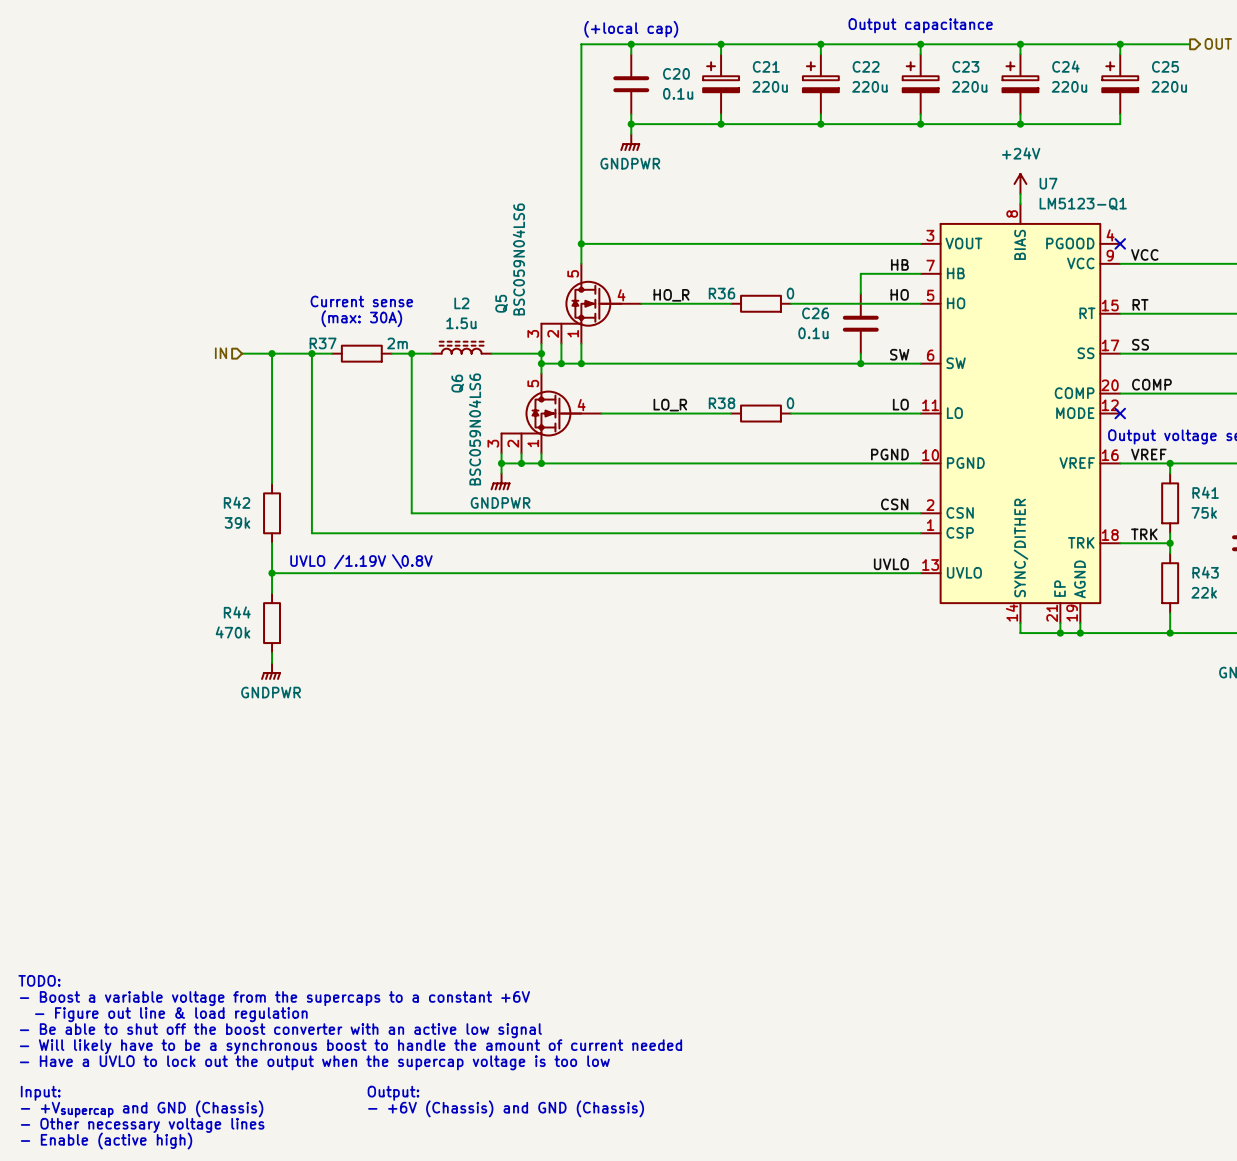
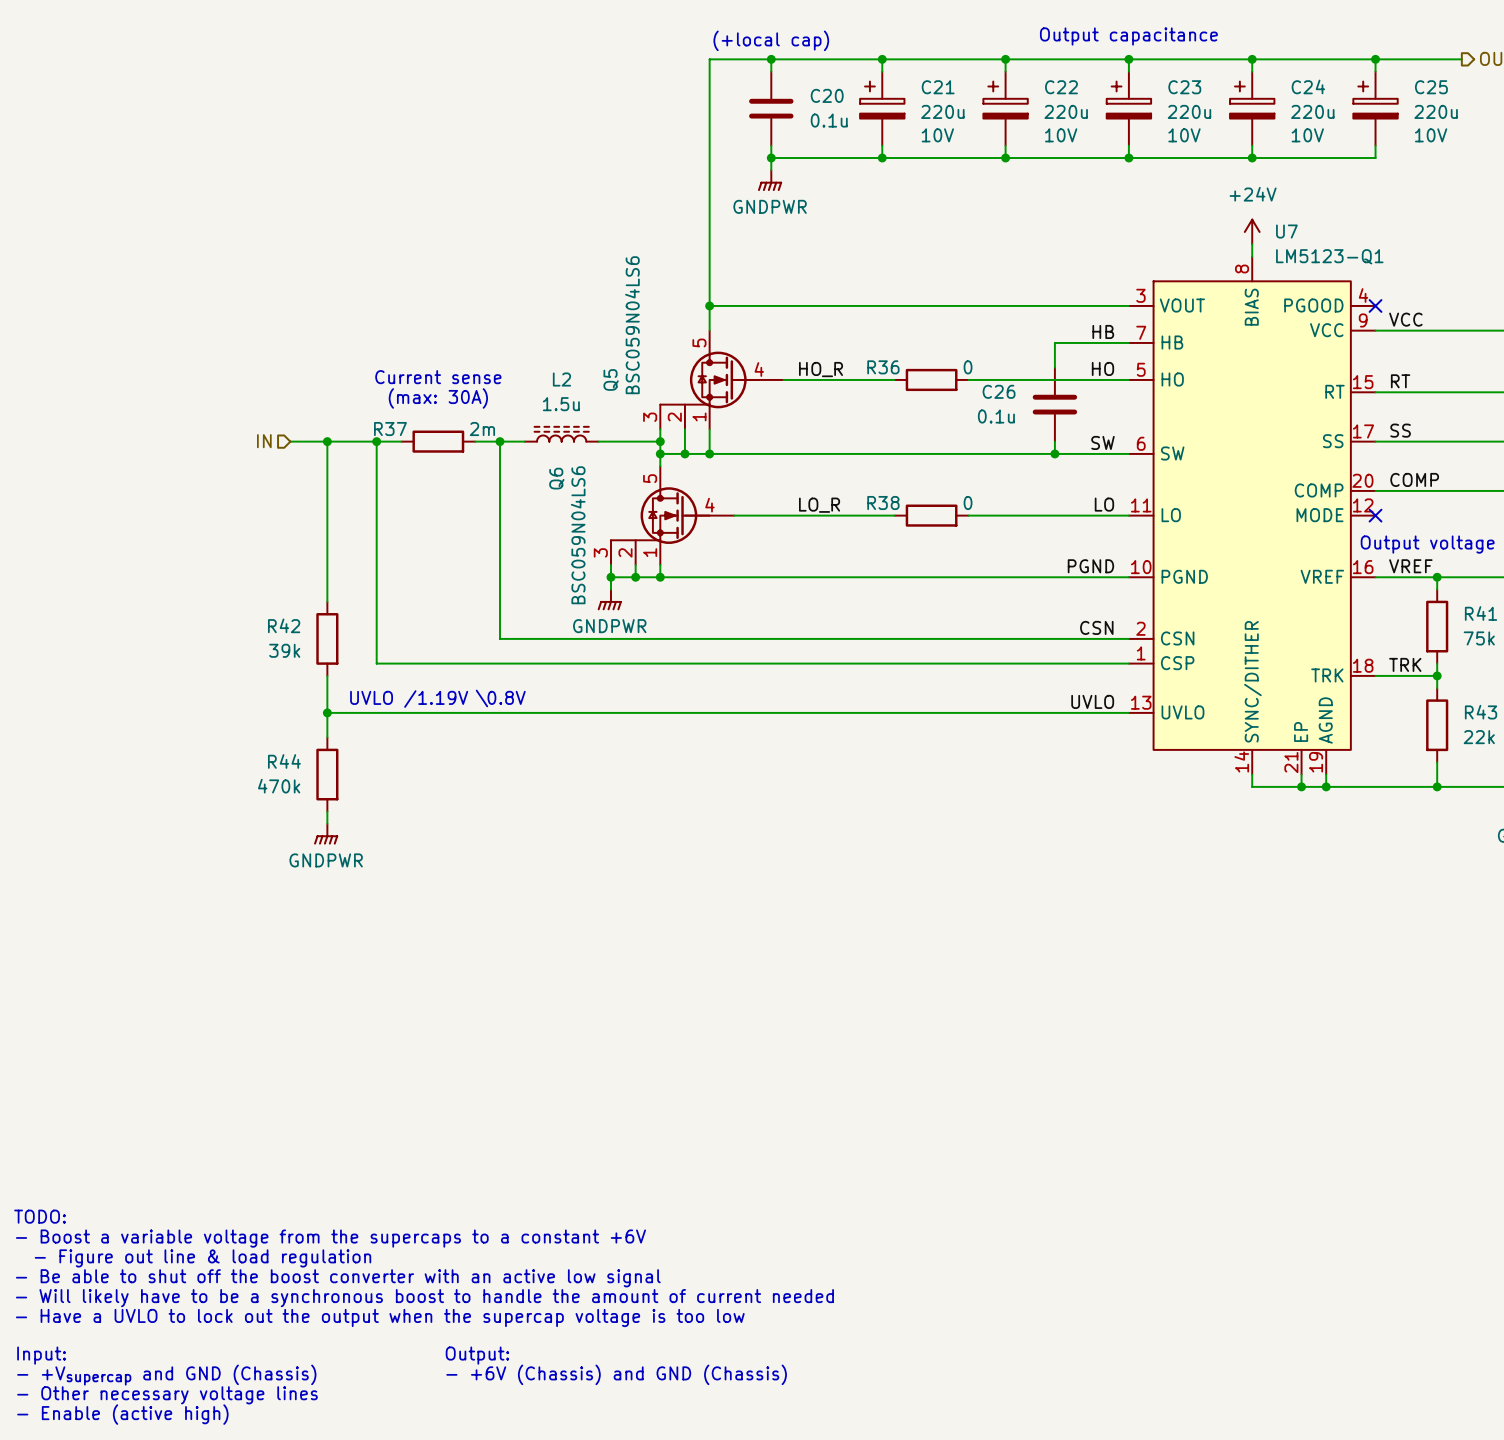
C21 text: none -> 10V (937, 135)
C22 text: none -> 10V (1061, 135)
C23 text: none -> 10V (1184, 135)
C24 text: none -> 10V (1307, 135)
C25 text: none -> 10V (1431, 135)

